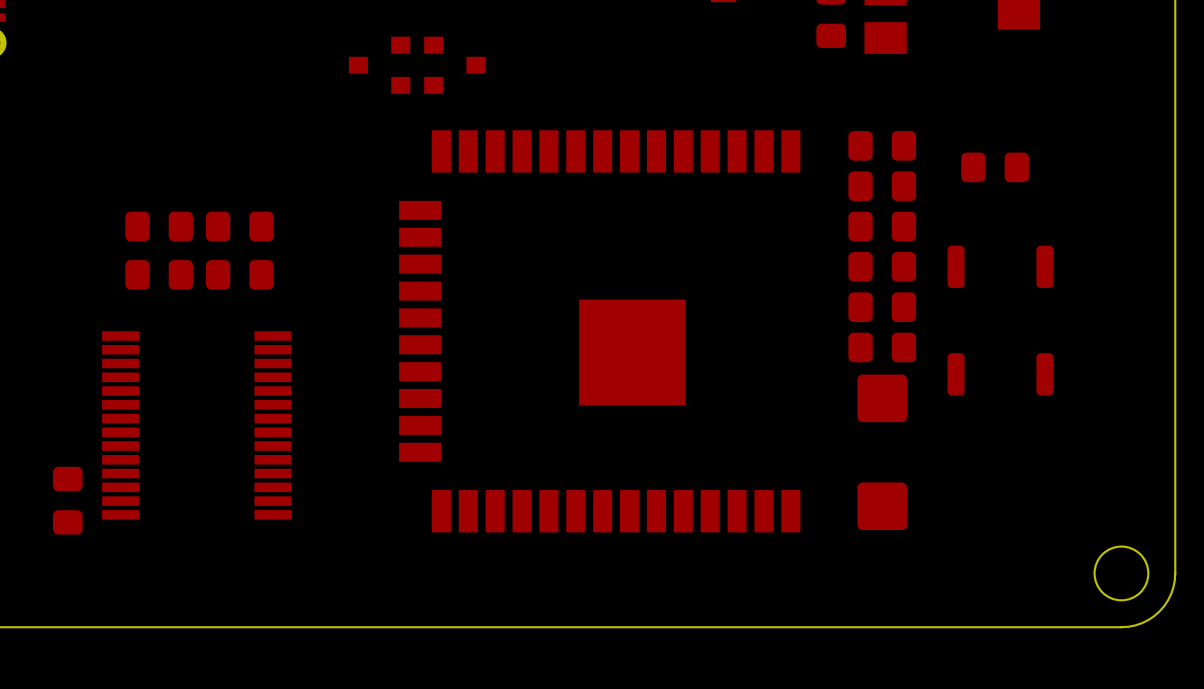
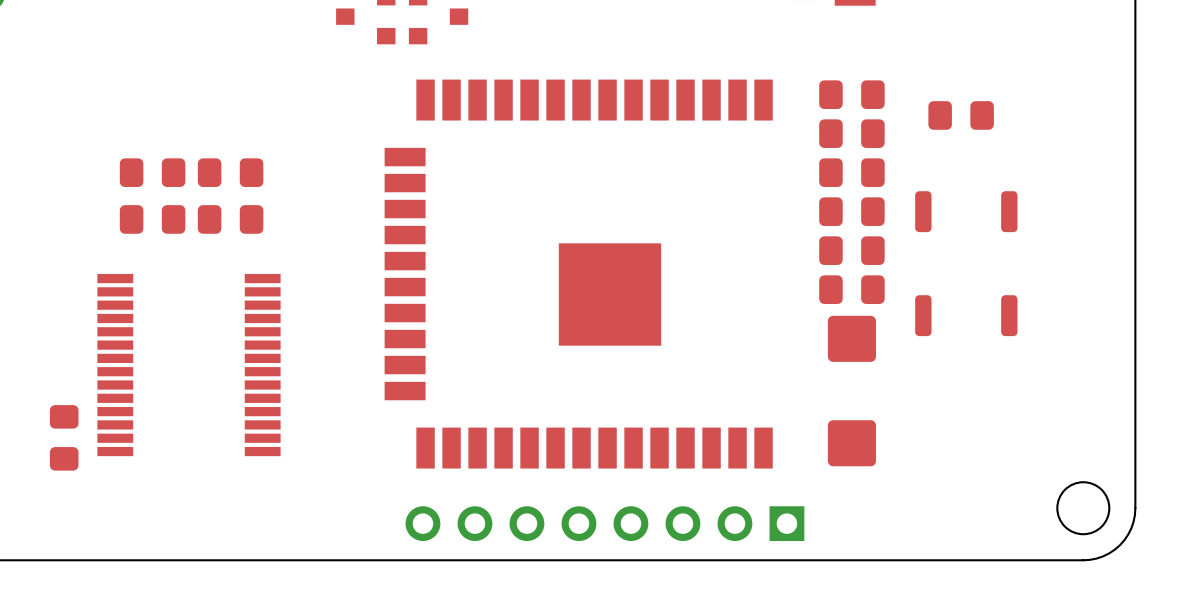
part: none -> (604, 523)

